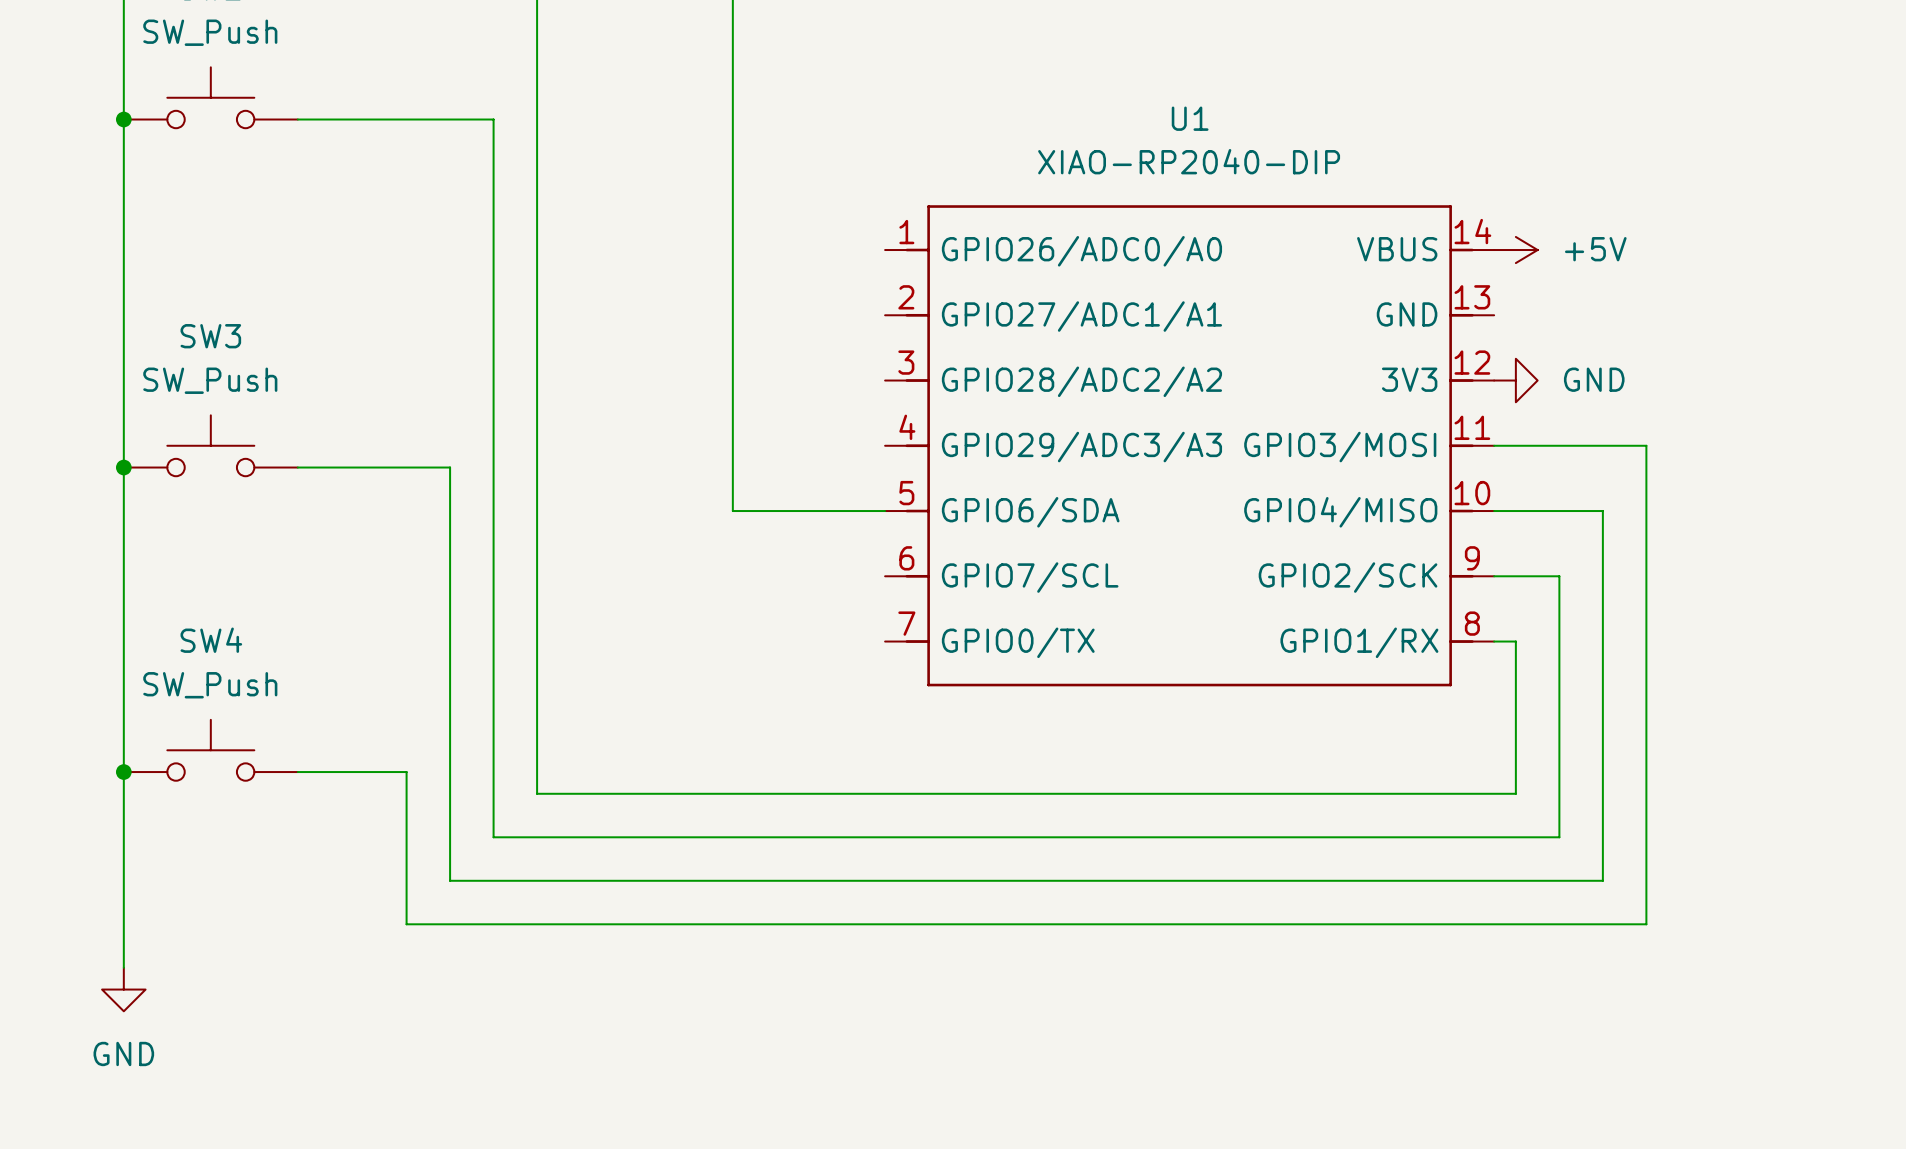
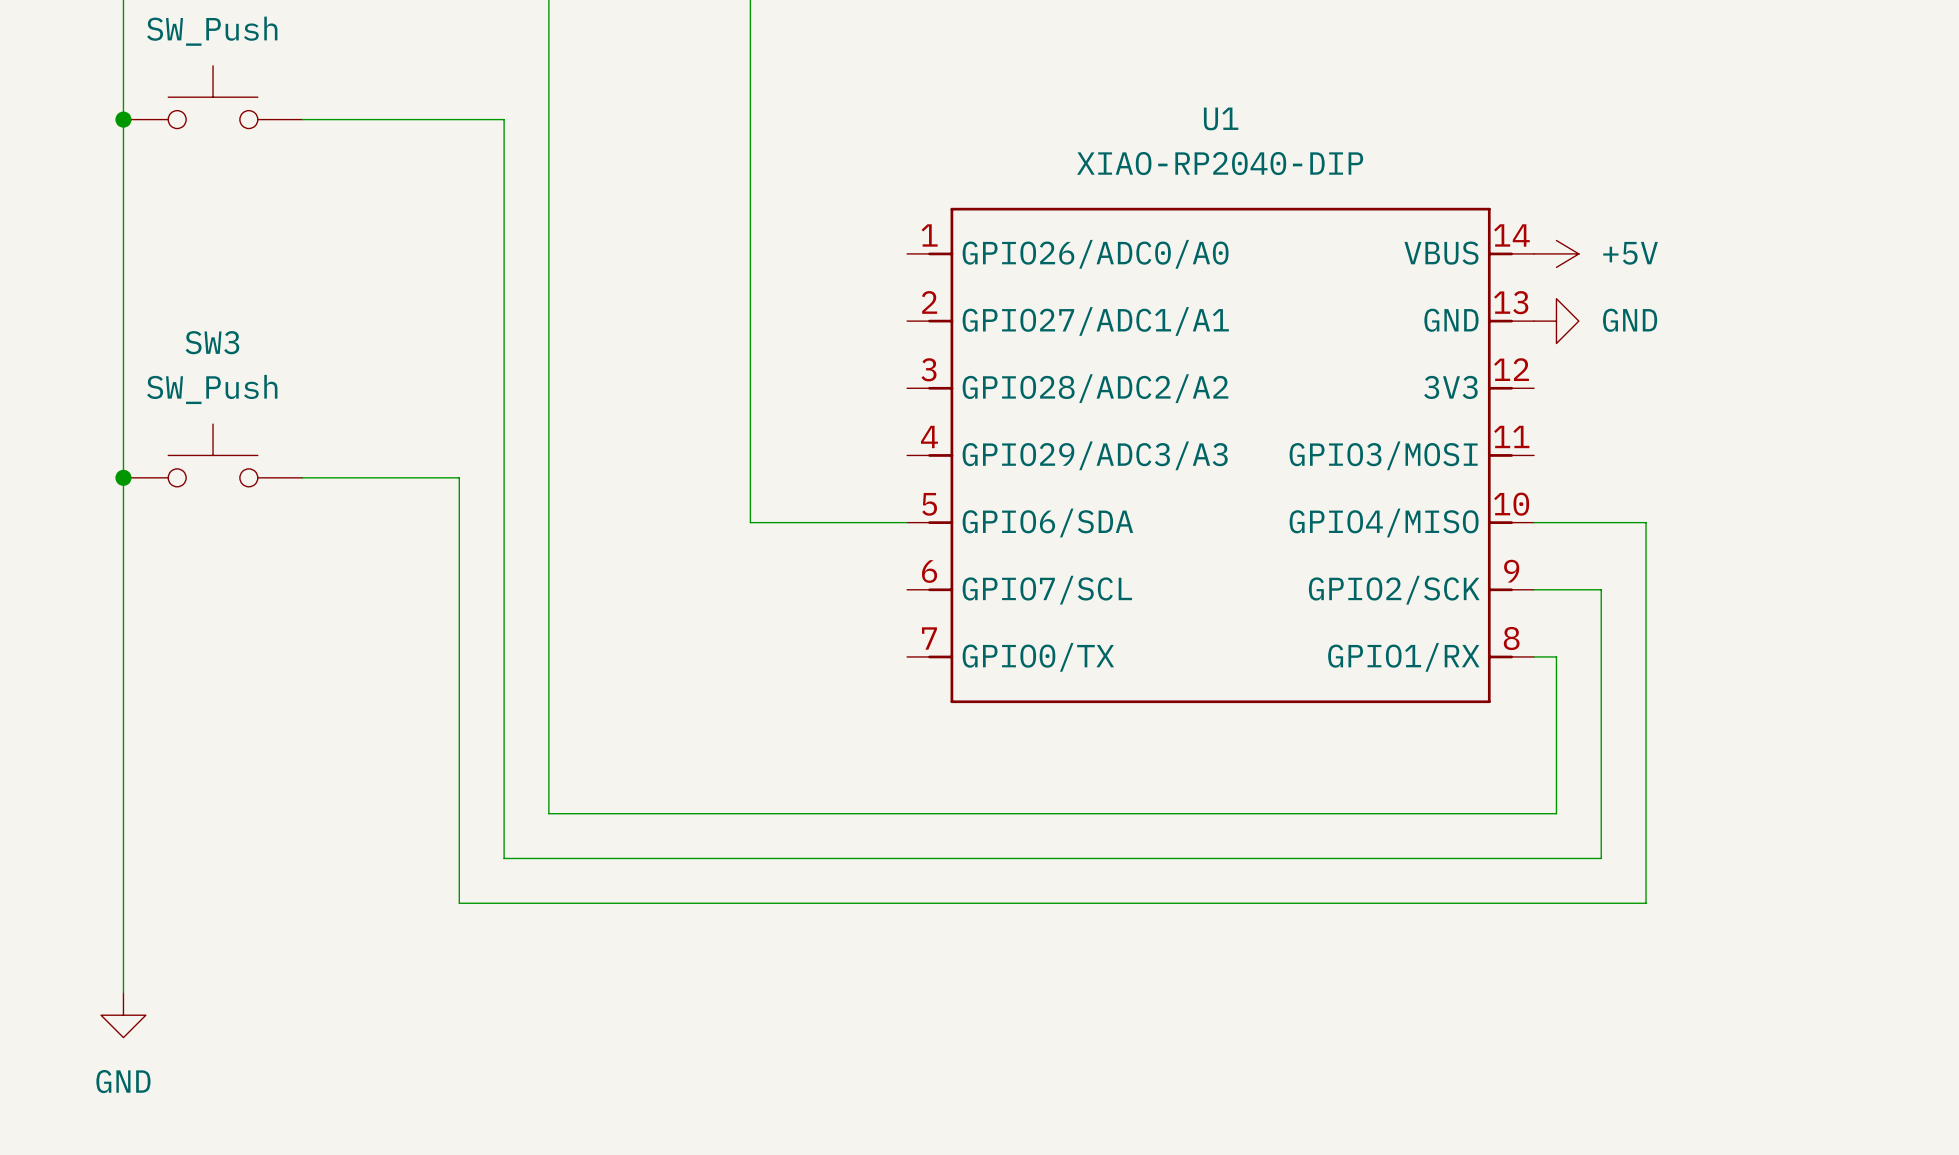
power symbol position: GND (1515, 380) -> GND (1556, 321)
wire: (1494, 445) (1646, 445) (1646, 924) (406, 924) (406, 772) (297, 772) -> none
SW4: SW_Push (210, 750) -> none
junction: (123, 772) -> none

